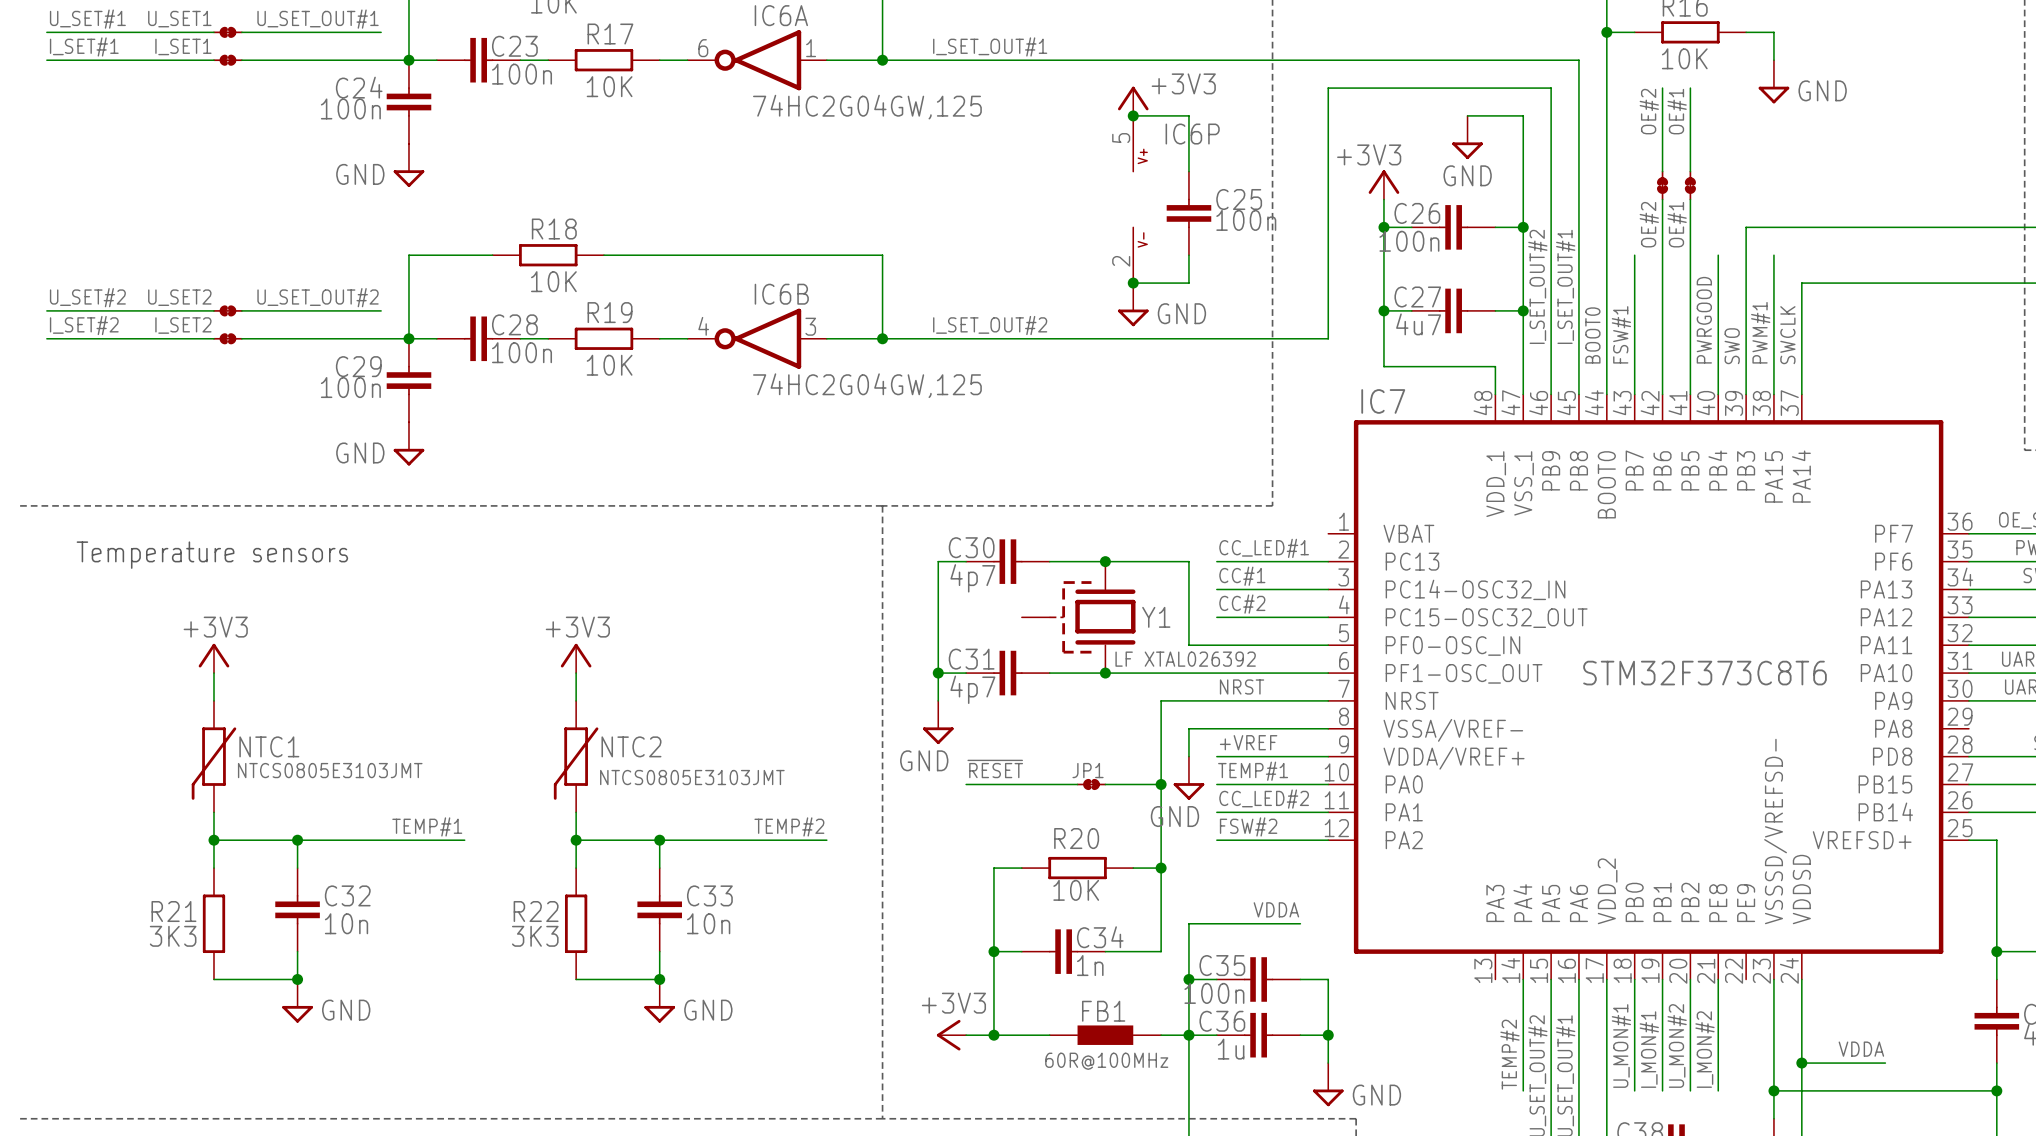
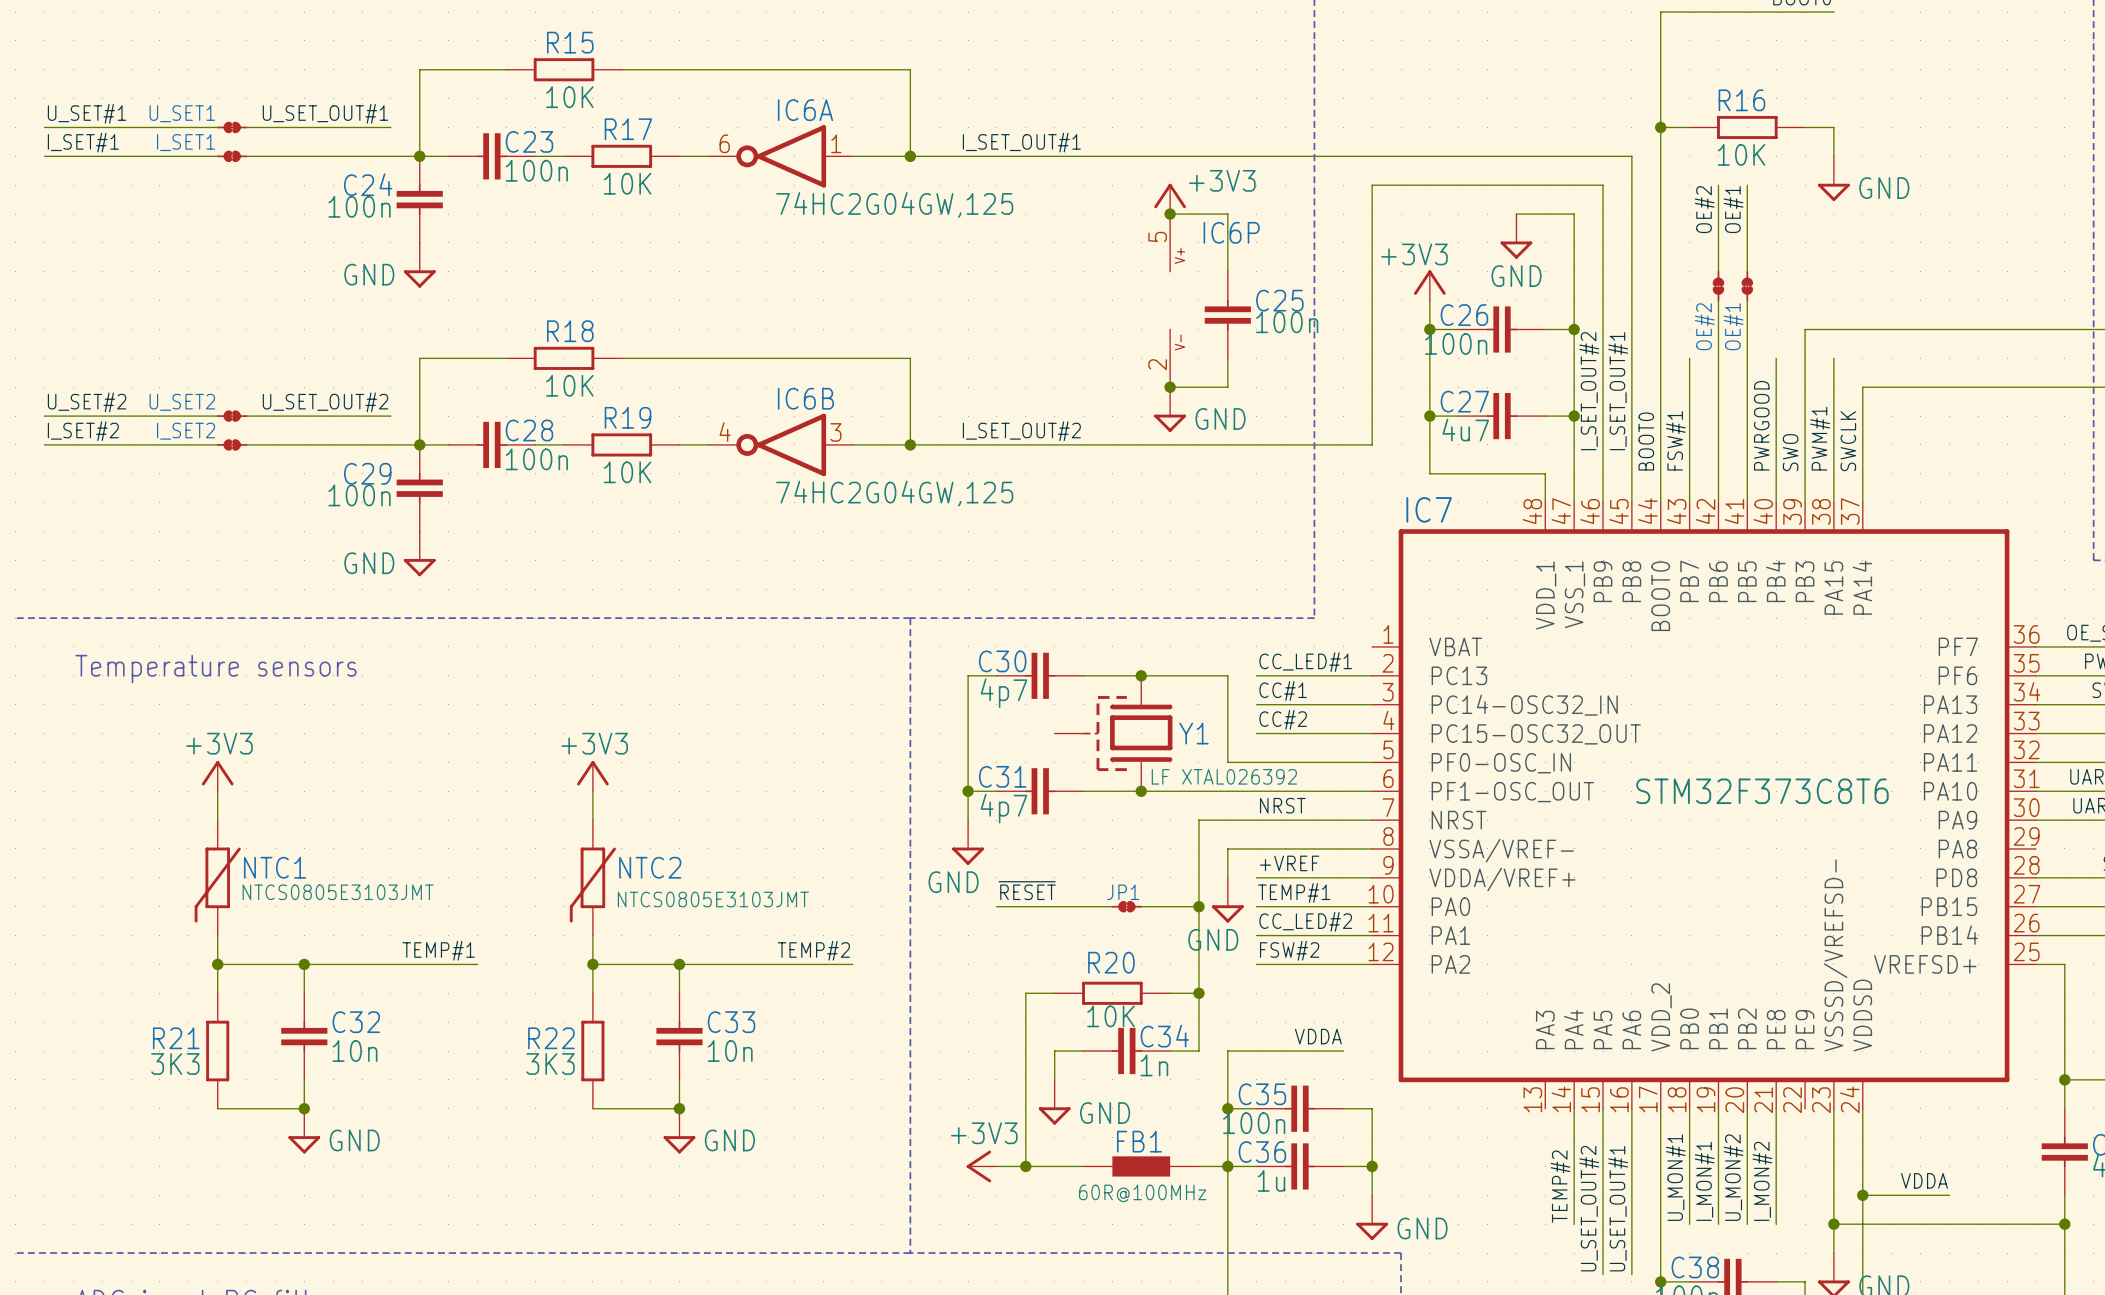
wire: (1161, 923) (1161, 951) (1105, 951) -> (1198, 1051) (1170, 1051)
wire: (993, 951) (1021, 951) -> (1083, 1051) (1054, 1051) (1054, 1079)
junction: (993, 951) -> none
C34 position: (1063, 951) -> (1126, 1051)
power symbol: none -> GND (1054, 1102)

